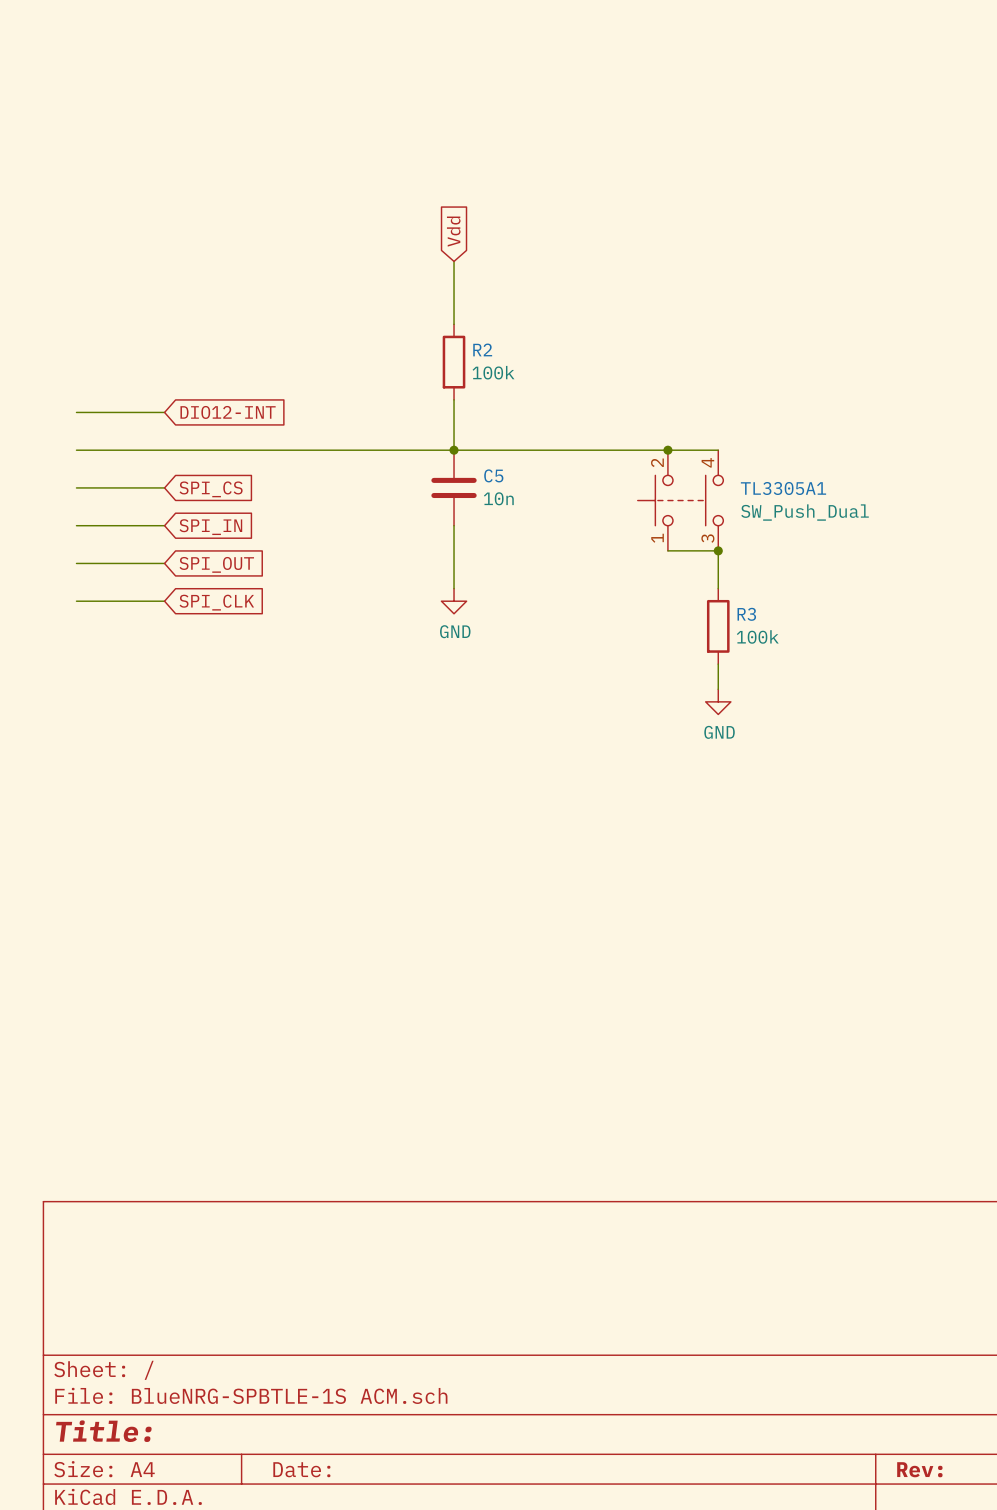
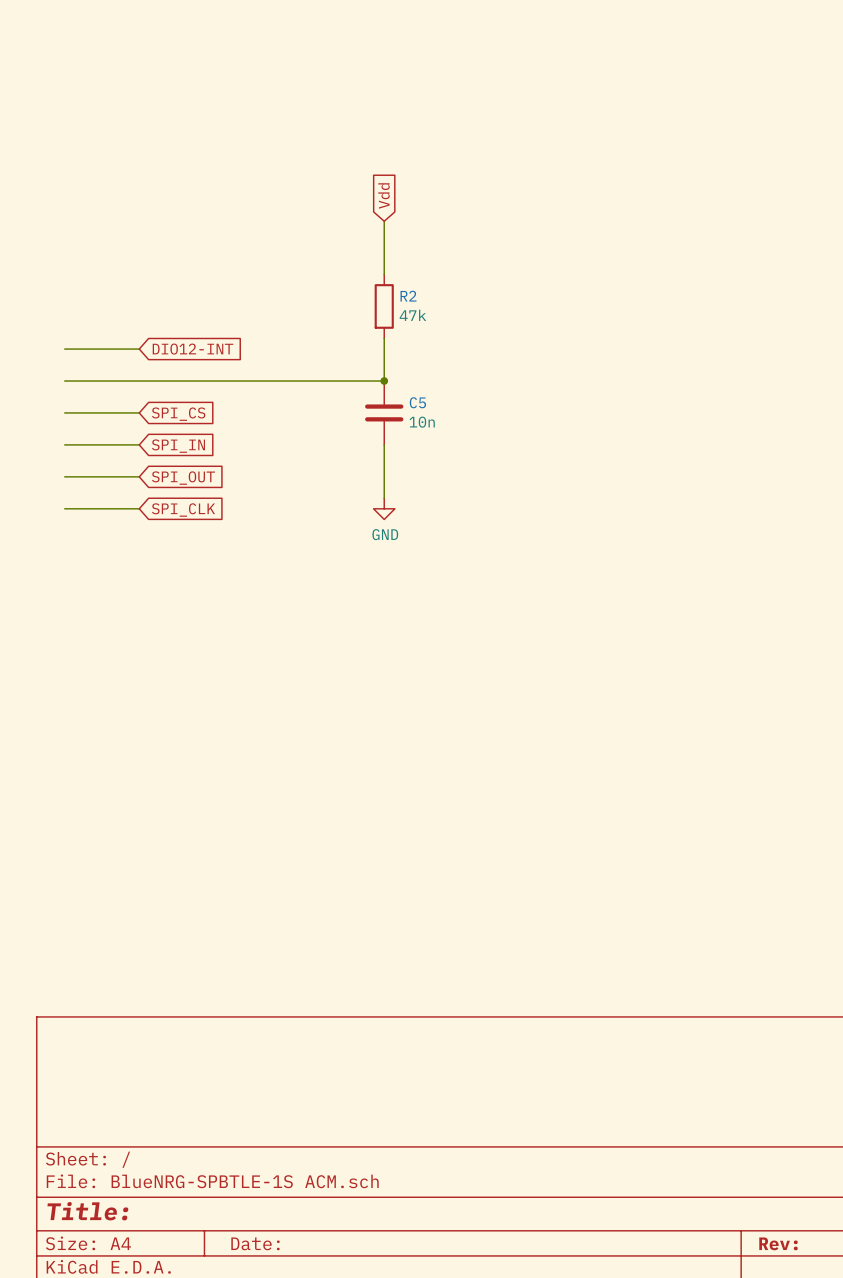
R2 value: 100k (493, 372) -> 47k (412, 315)
wire: (454, 450) (718, 450) -> none
junction: (667, 450) -> none
TL3305A1: SW_Push_Dual (680, 500) -> none
wire: (667, 550) (718, 550) (718, 588) -> none
junction: (718, 550) -> none
R3: 100k (718, 626) -> none
wire: (718, 664) (718, 689) -> none
power symbol: GND (718, 701) -> none

